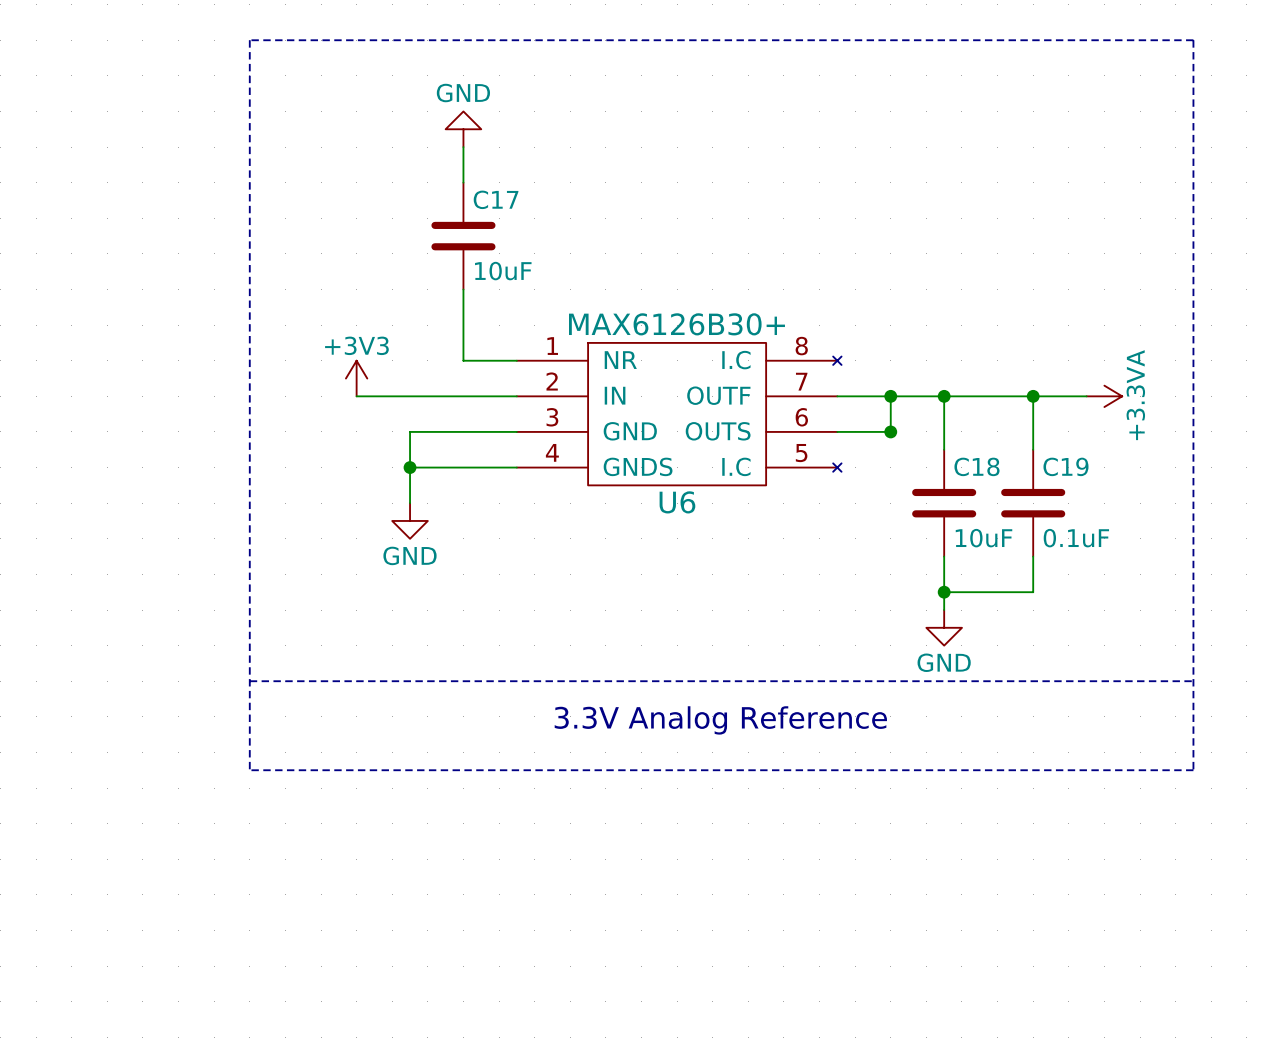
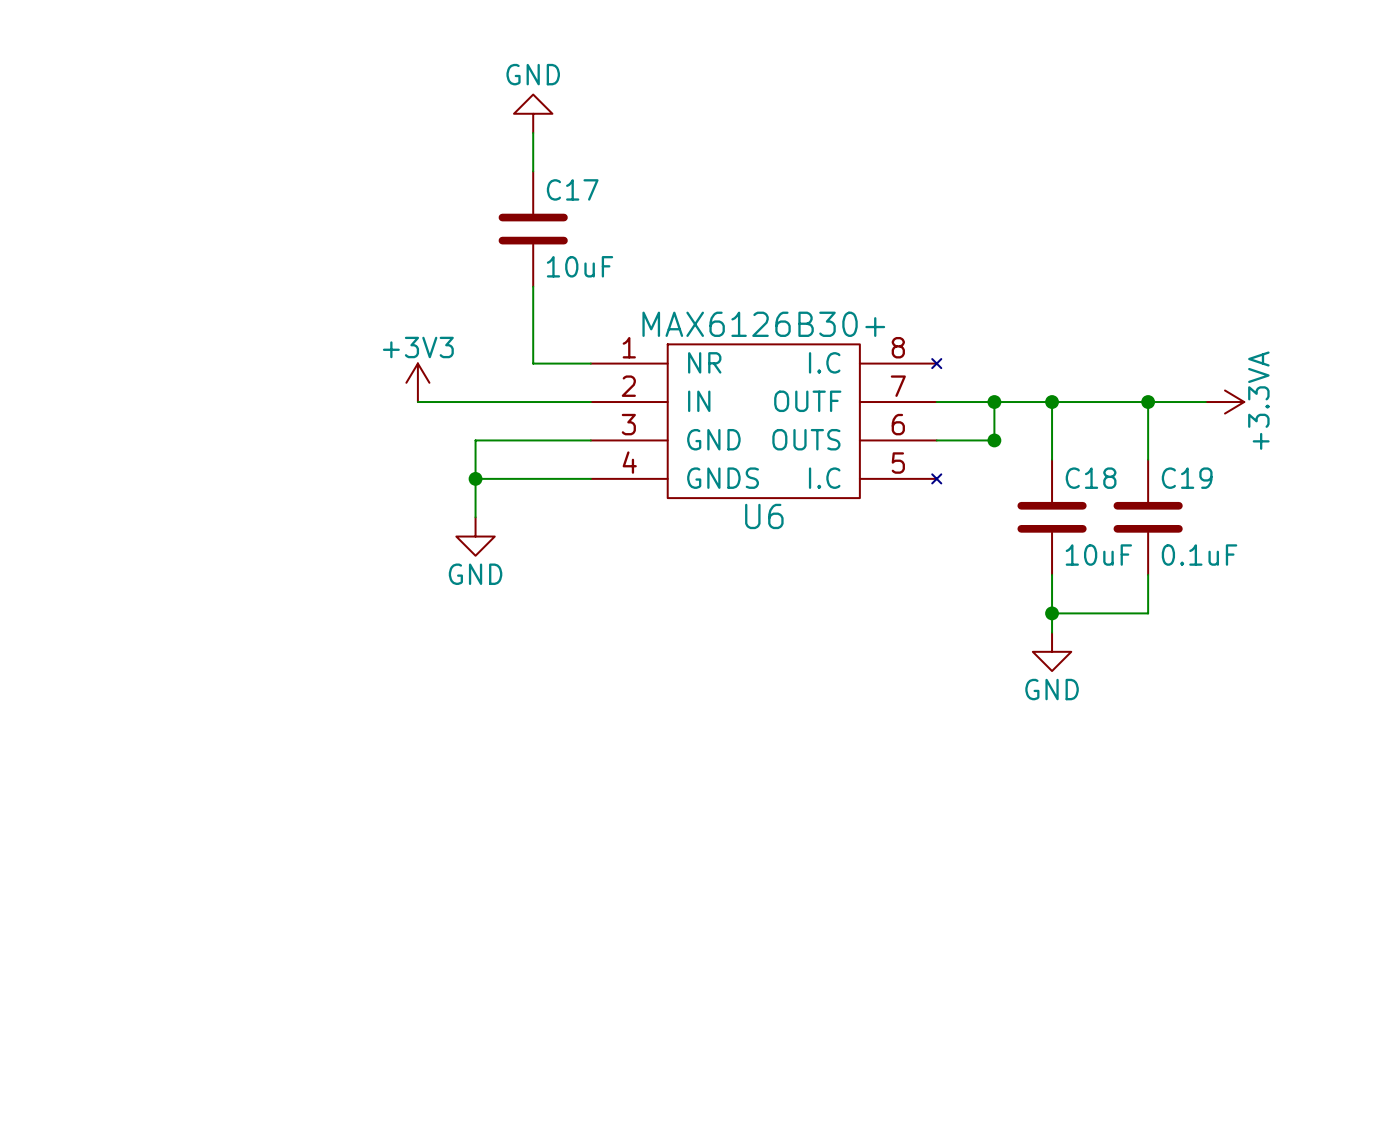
line: (249, 40) (249, 770) (1193, 770) (1193, 40) (249, 40) -> none
line: (249, 681) (1193, 681) -> none
text: 3.3V Analog Reference (720, 720) -> none

